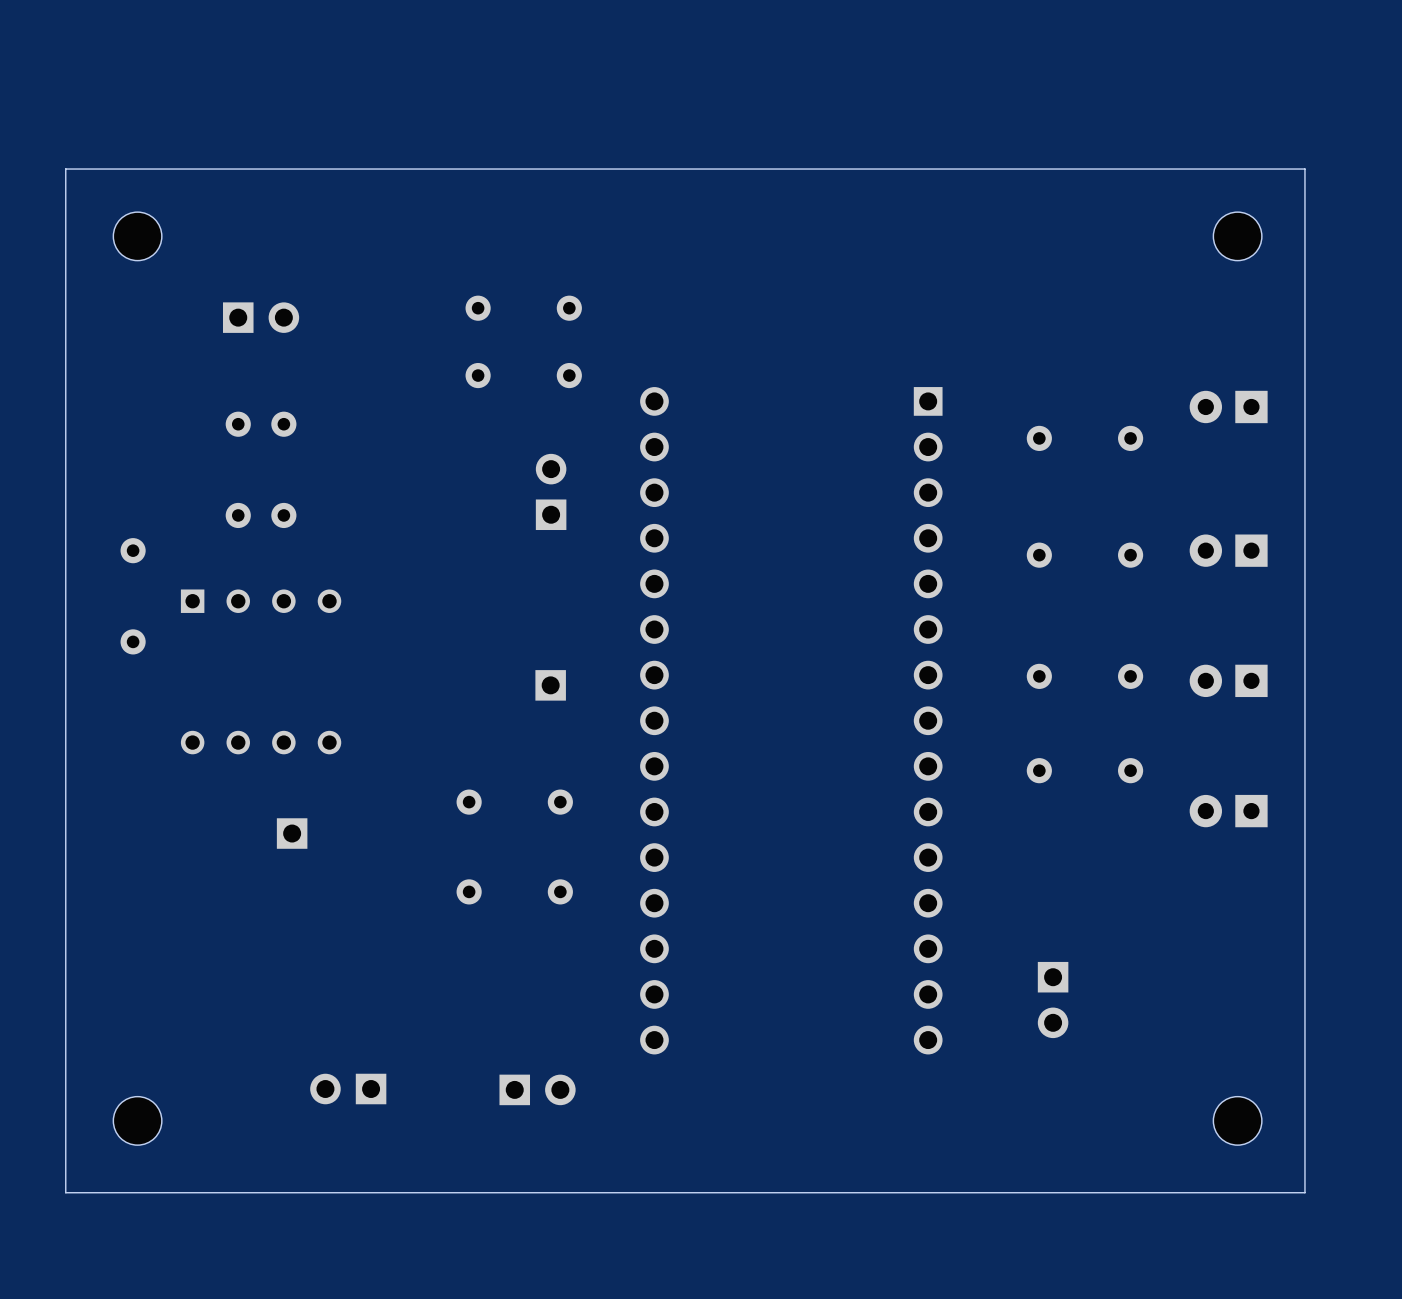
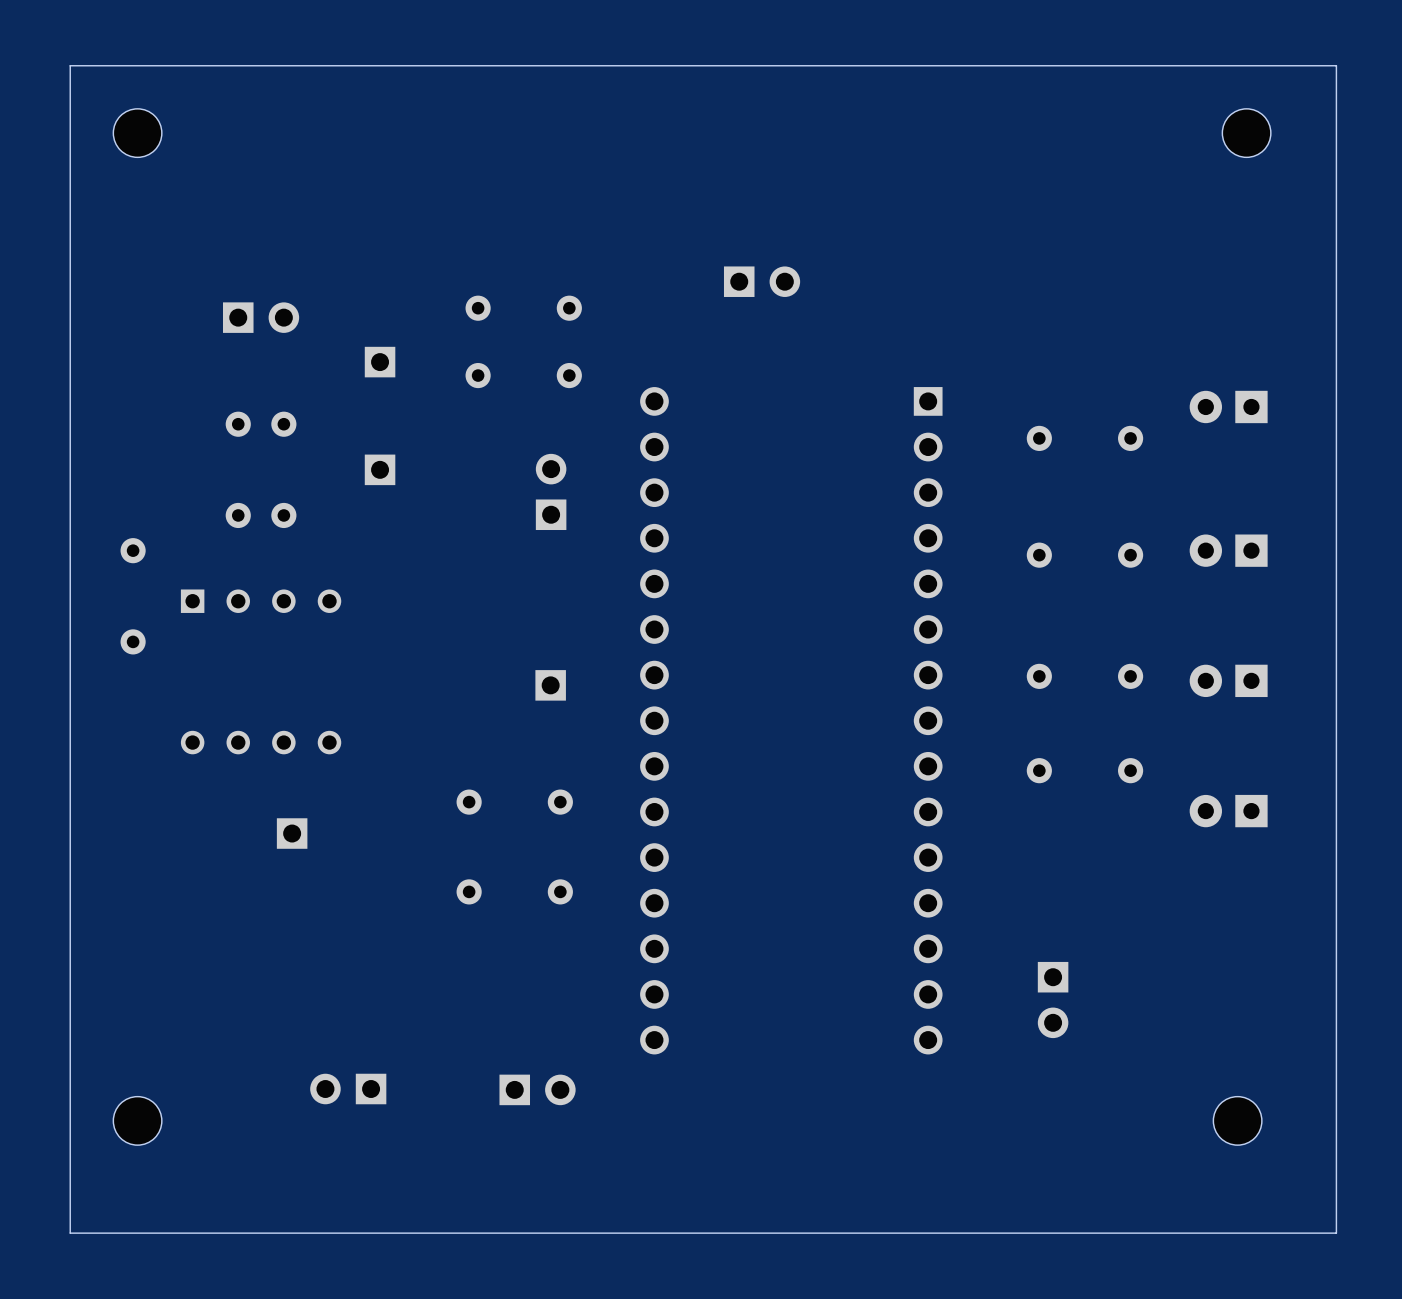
board edge: (1304, 169) (65, 169) (65, 1192) (1304, 1192) (1304, 169) -> (1336, 65) (1336, 1233) (70, 1233) (70, 65) (1336, 65)
part position: (137, 236) -> (137, 133)
part position: (1237, 236) -> (1246, 133)
part: none -> (762, 281)
part: none -> (380, 362)
part: none -> (380, 469)

